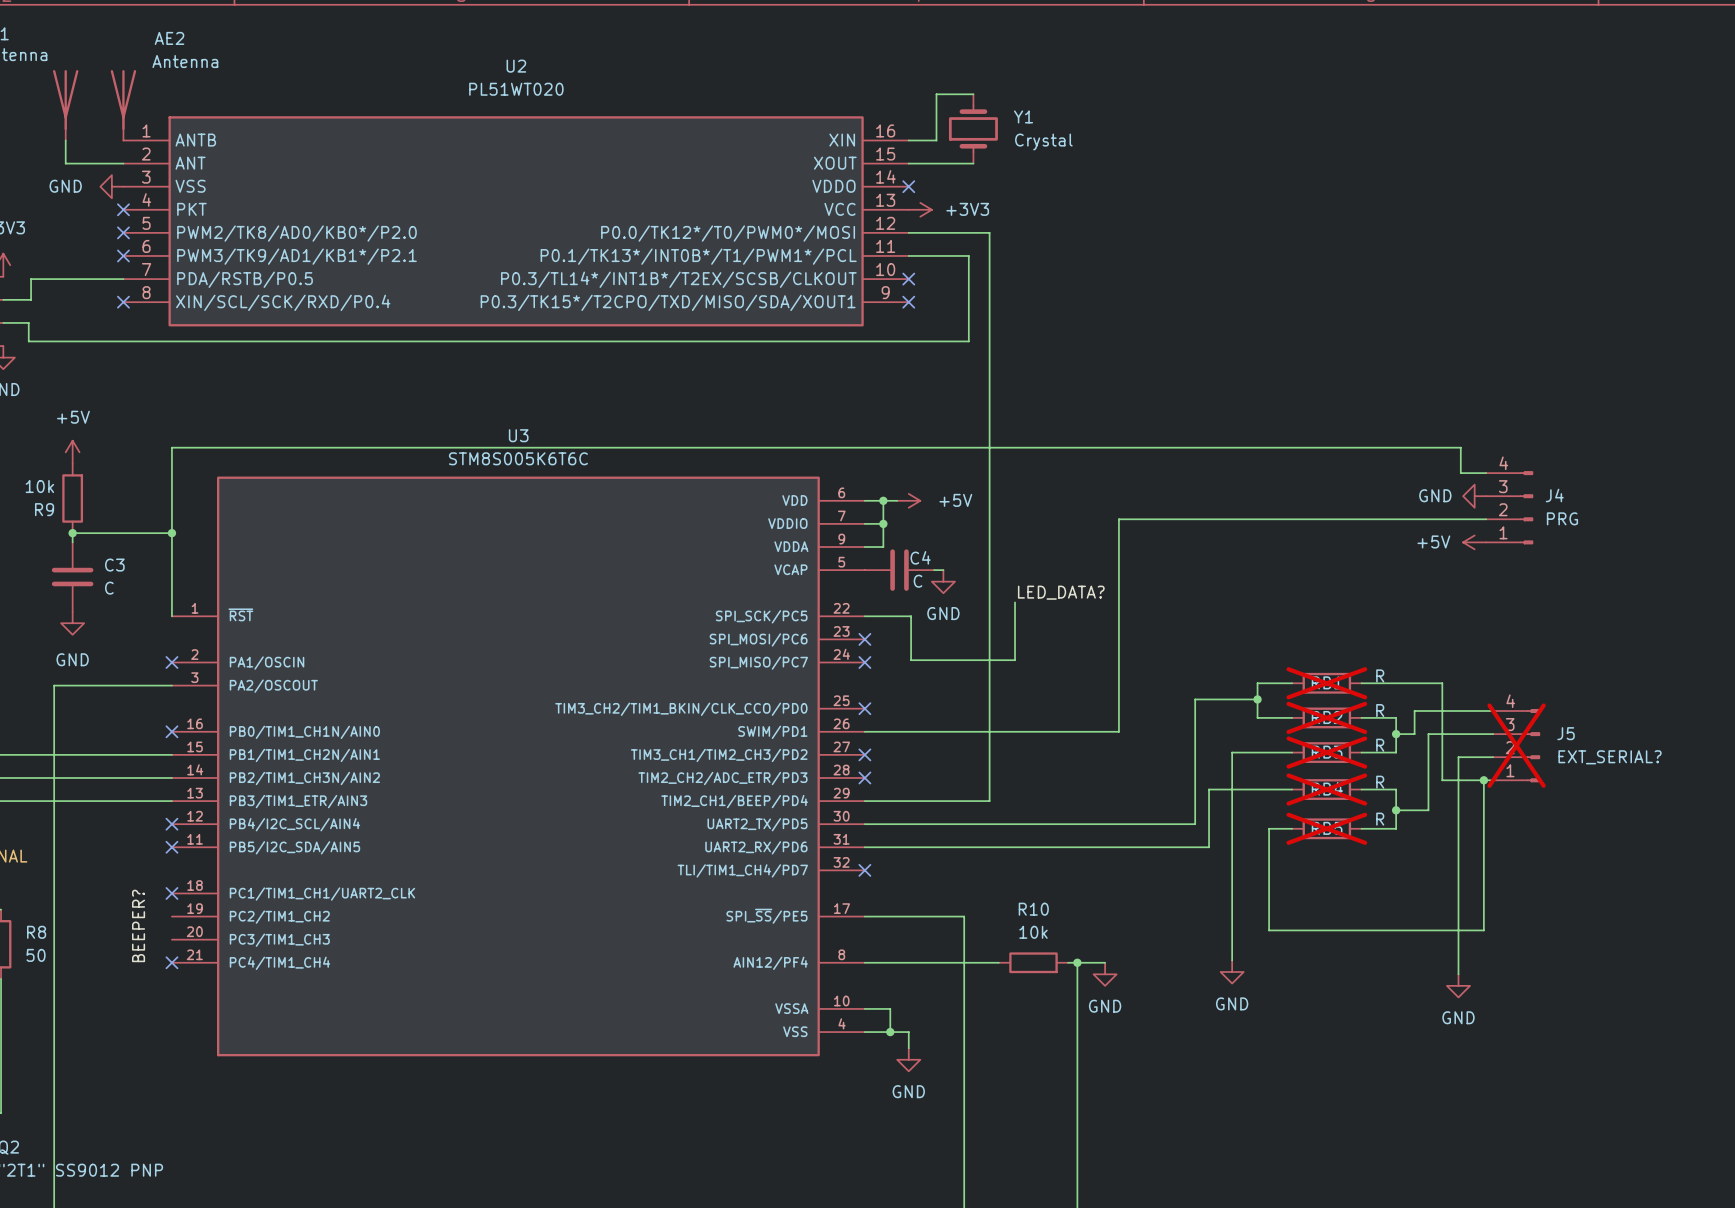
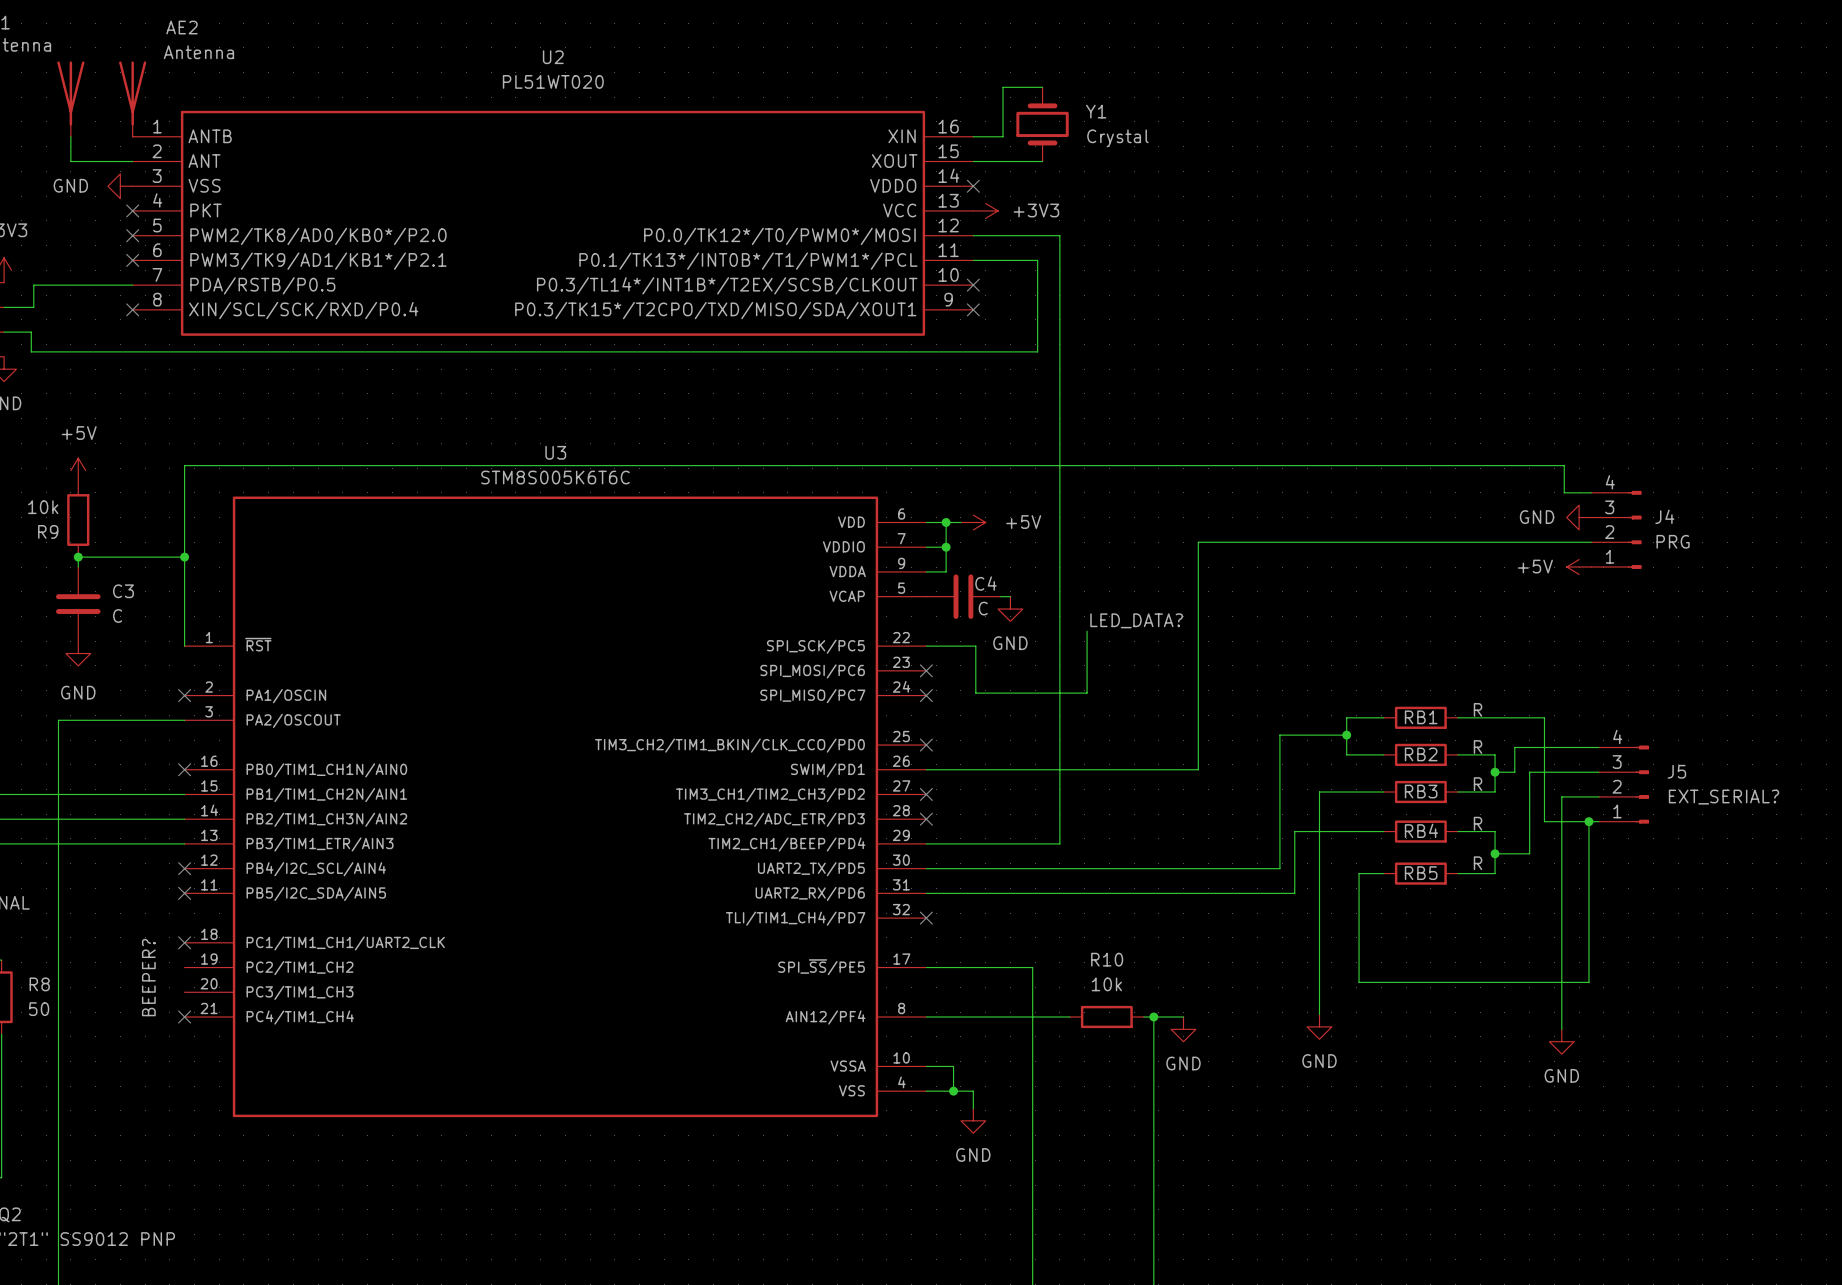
RB1 do-not-place cross: (1326, 683) -> none
RB2 do-not-place cross: (1326, 717) -> none
J5 do-not-place cross: (1516, 745) -> none
RB3 do-not-place cross: (1326, 752) -> none
RB4 do-not-place cross: (1326, 789) -> none
RB5 do-not-place cross: (1326, 828) -> none

